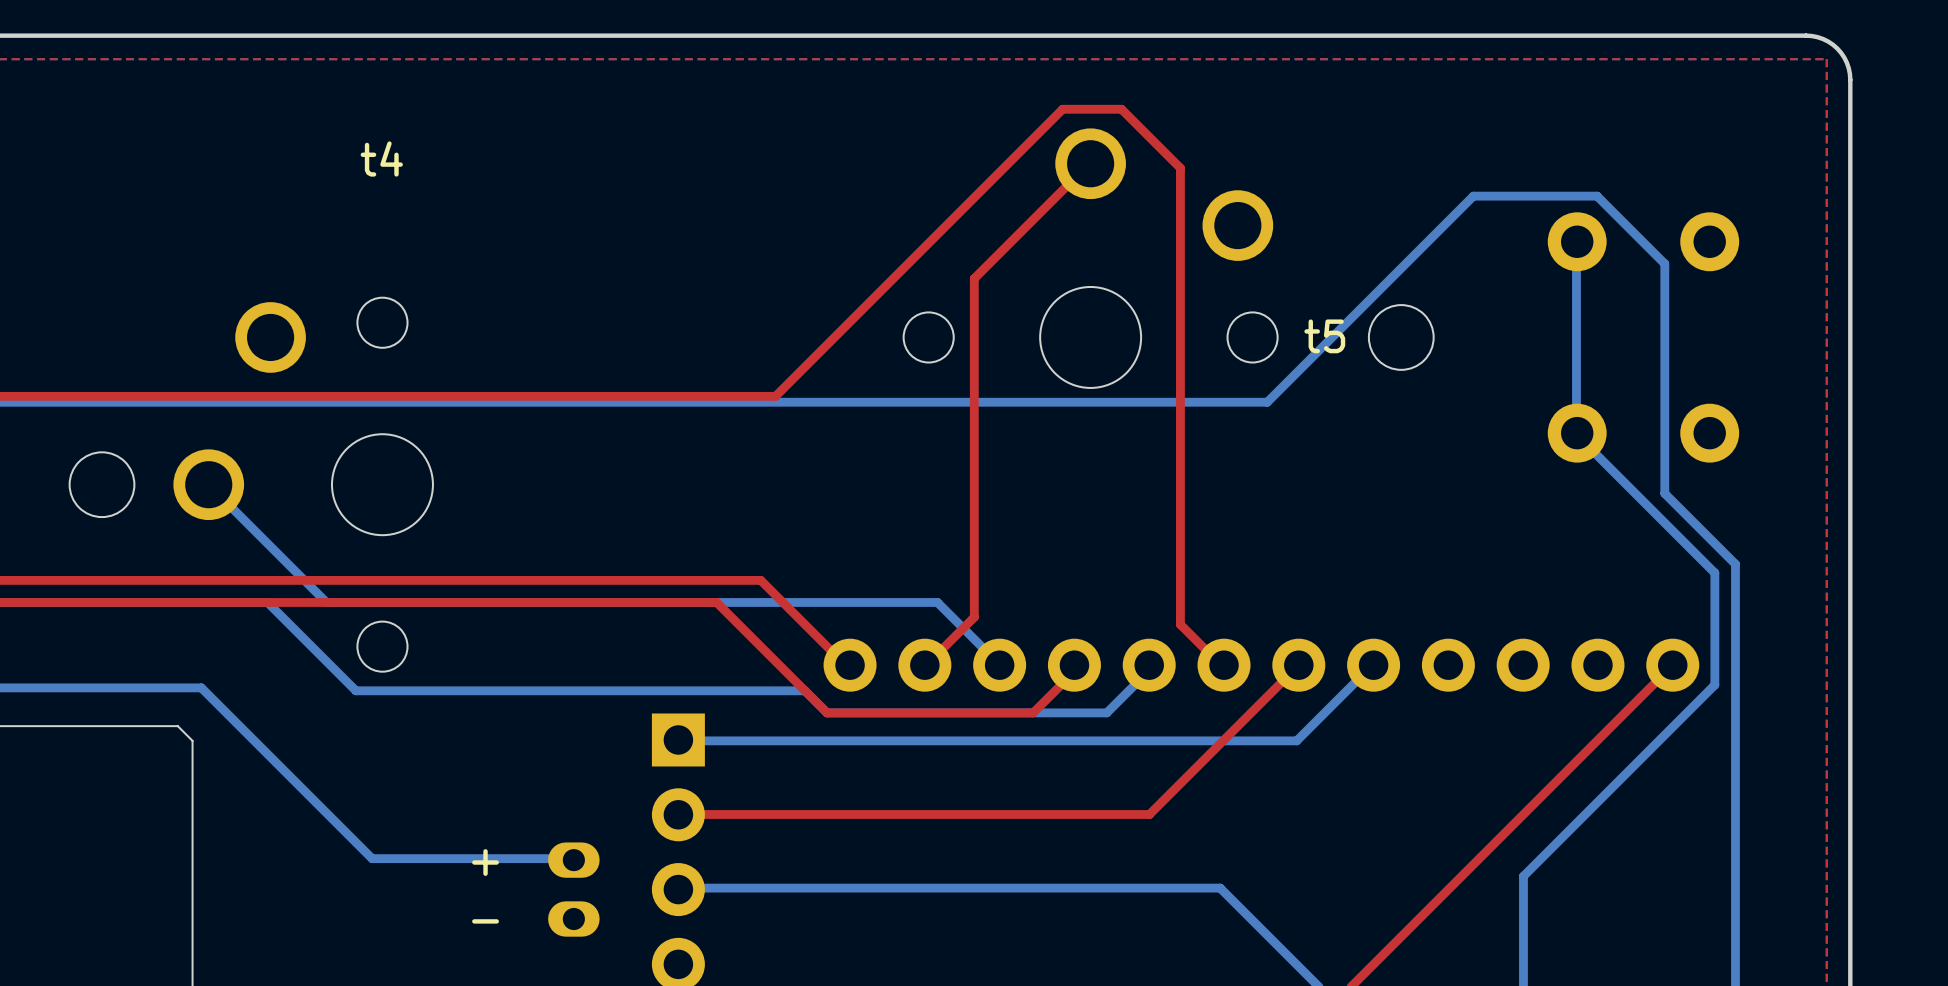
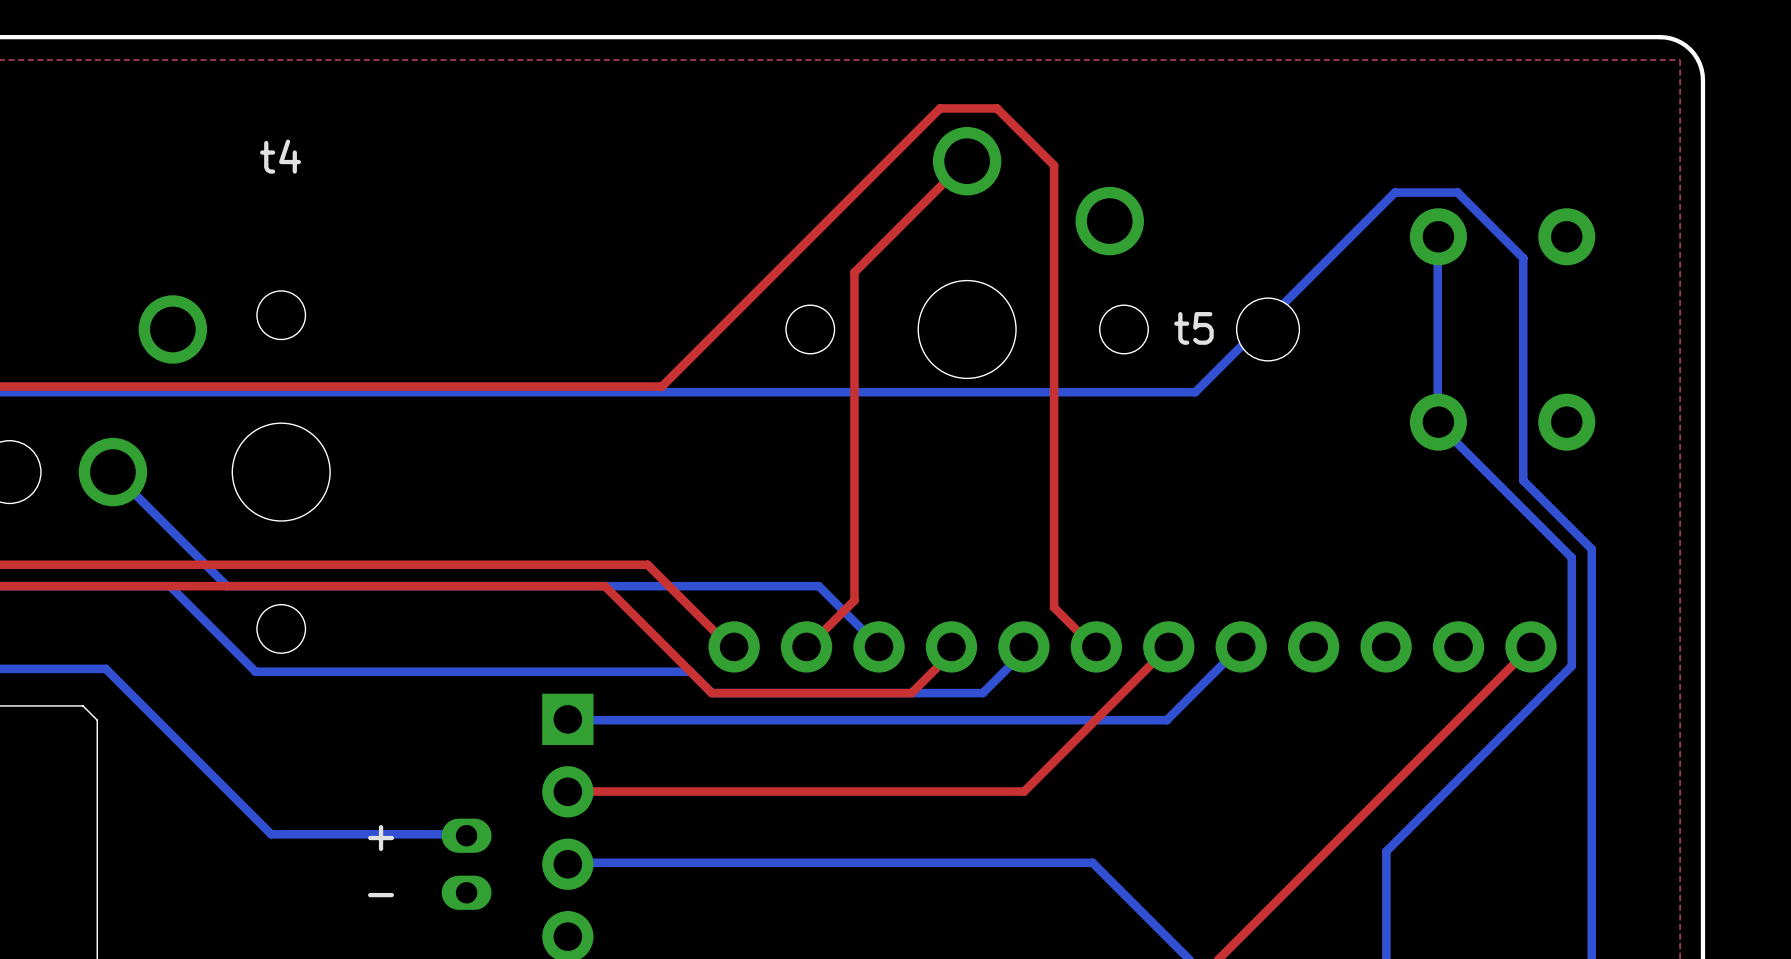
bottom track: (1532, 196) (1473, 196) (1267, 402) -> (1394, 192) (1195, 392) (1138, 392)

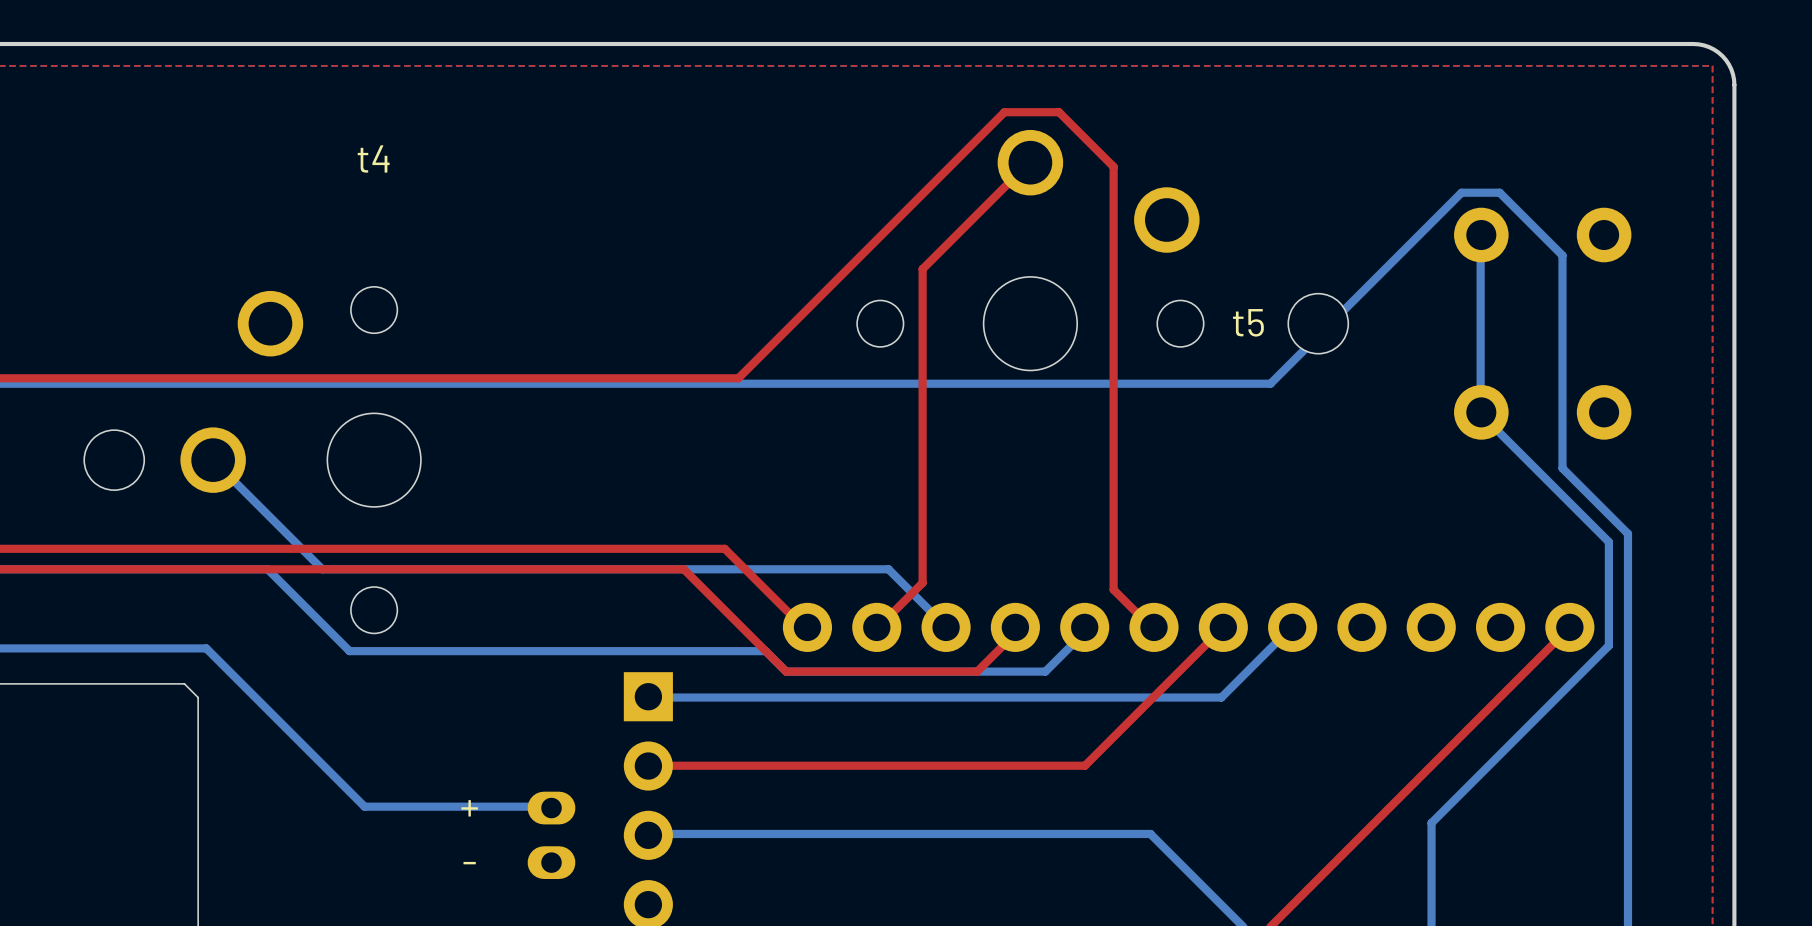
bottom track: (1417, 192) (1394, 192) (1195, 392) -> (1461, 192) (1270, 383) (1248, 383)

